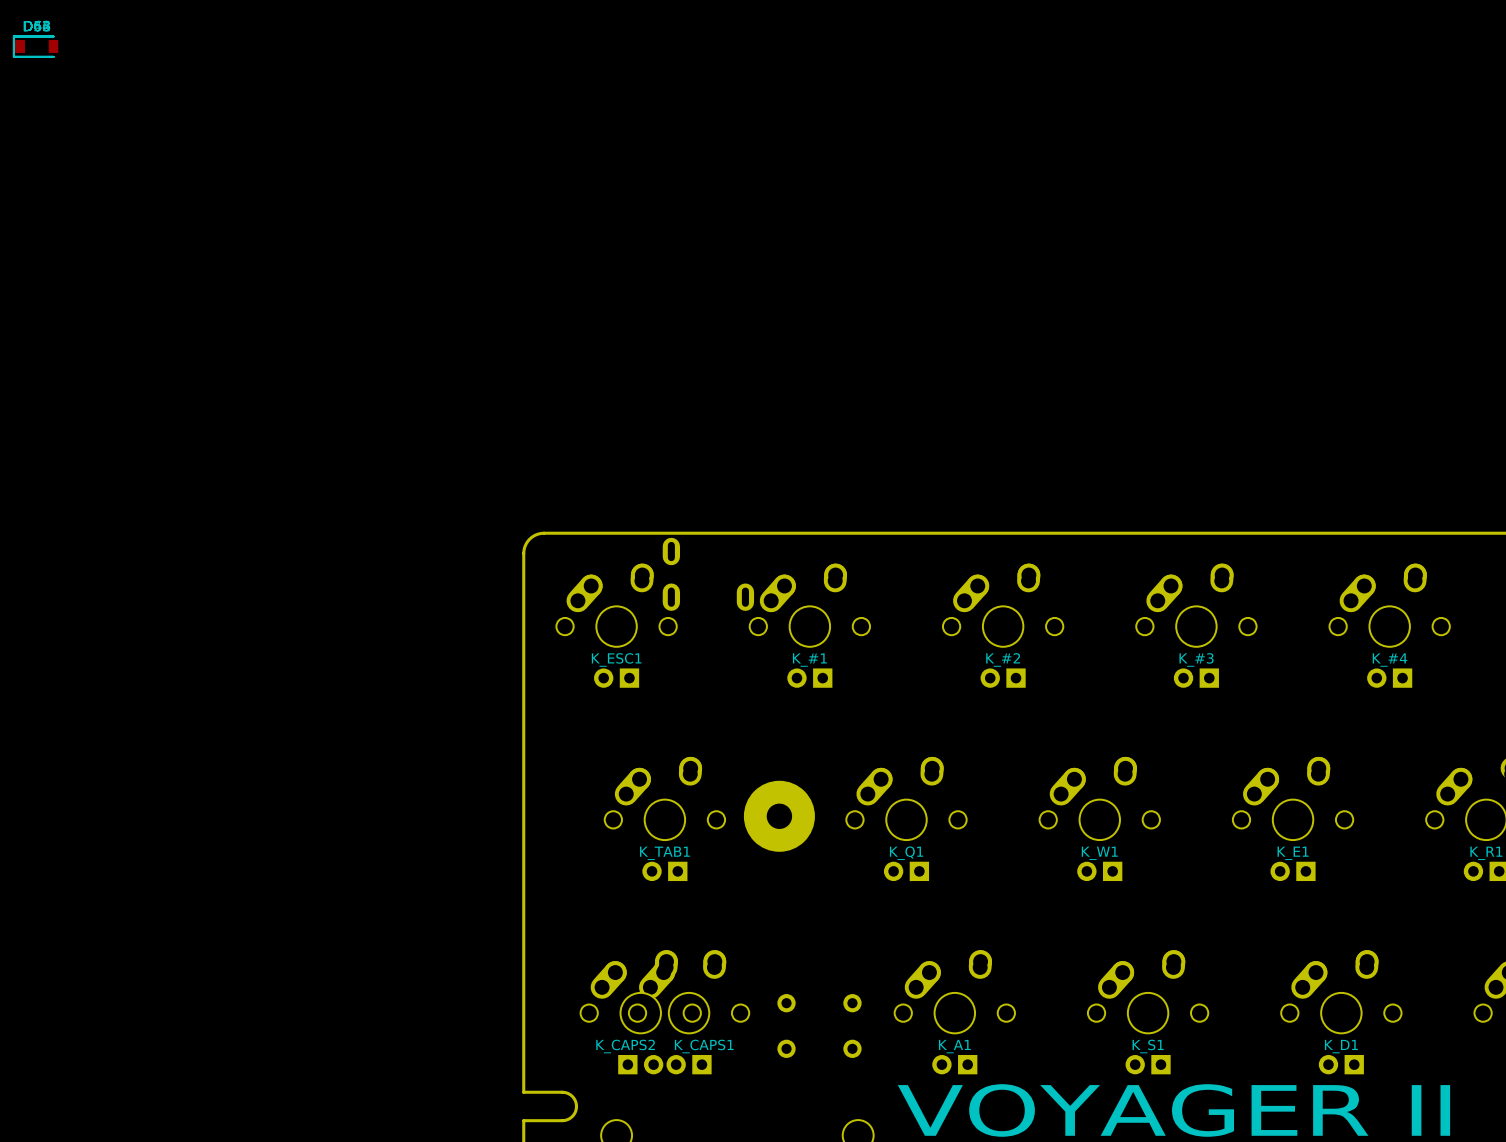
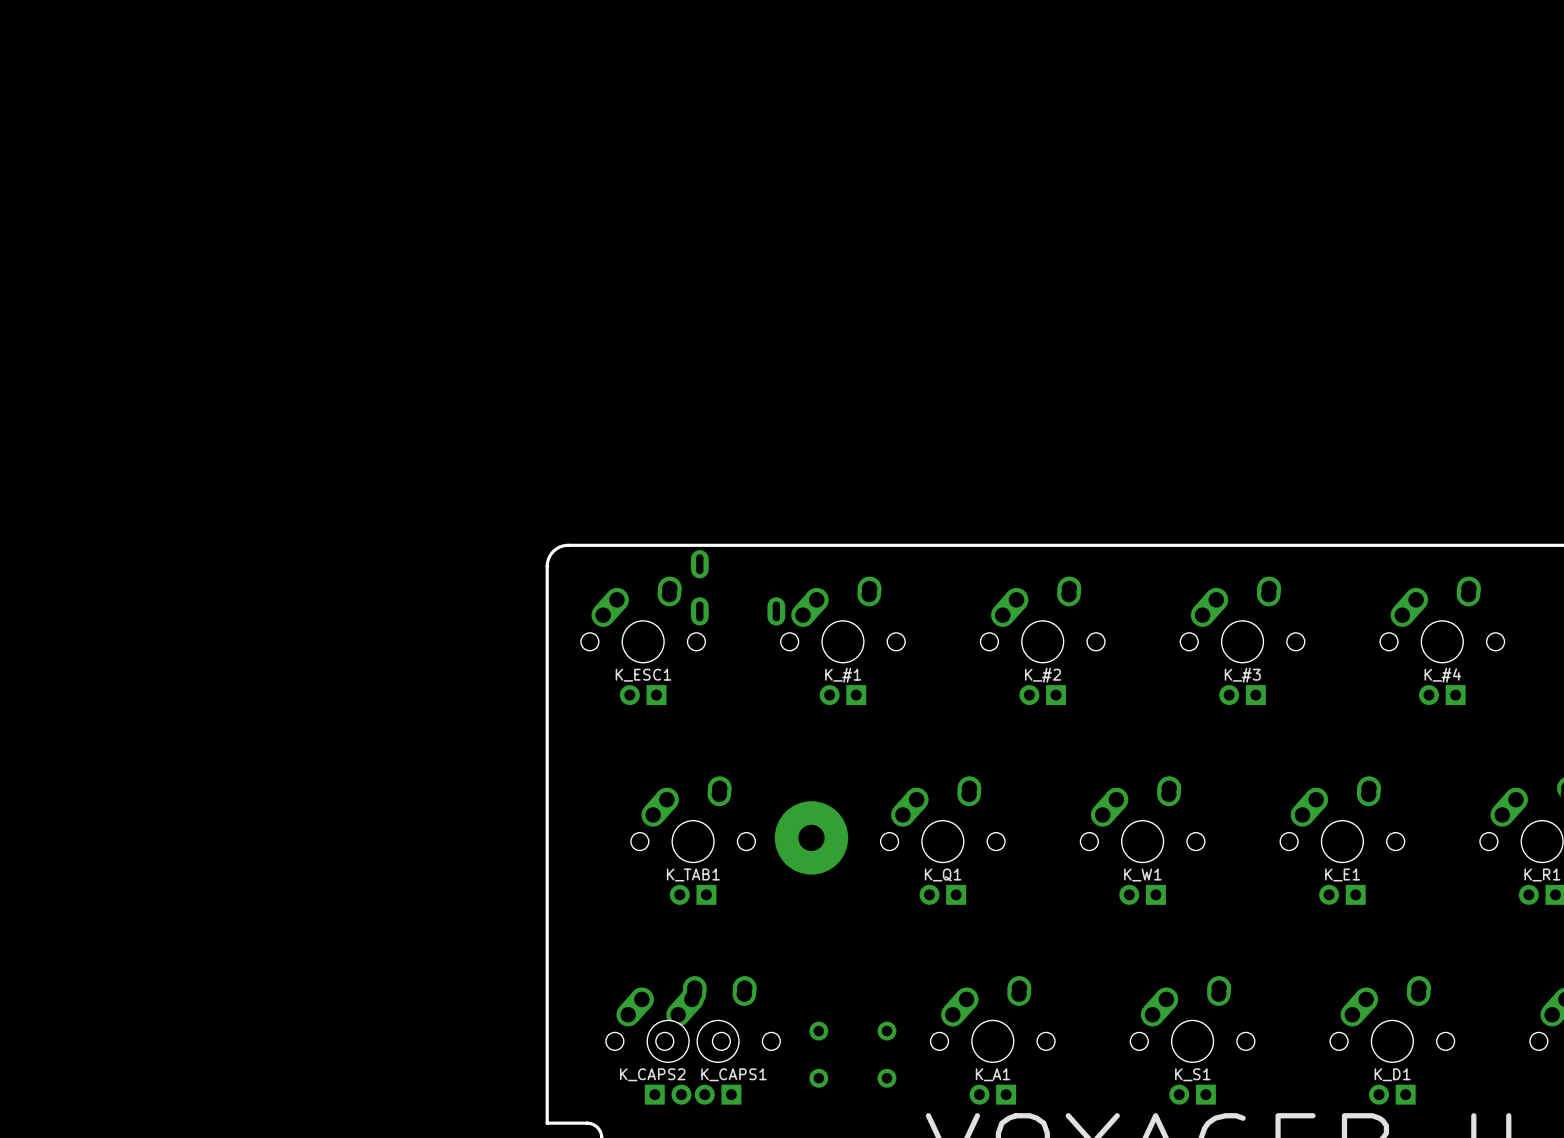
part: (35, 46) -> none
part: (35, 46) -> none
part: (35, 46) -> none
part: (35, 46) -> none

